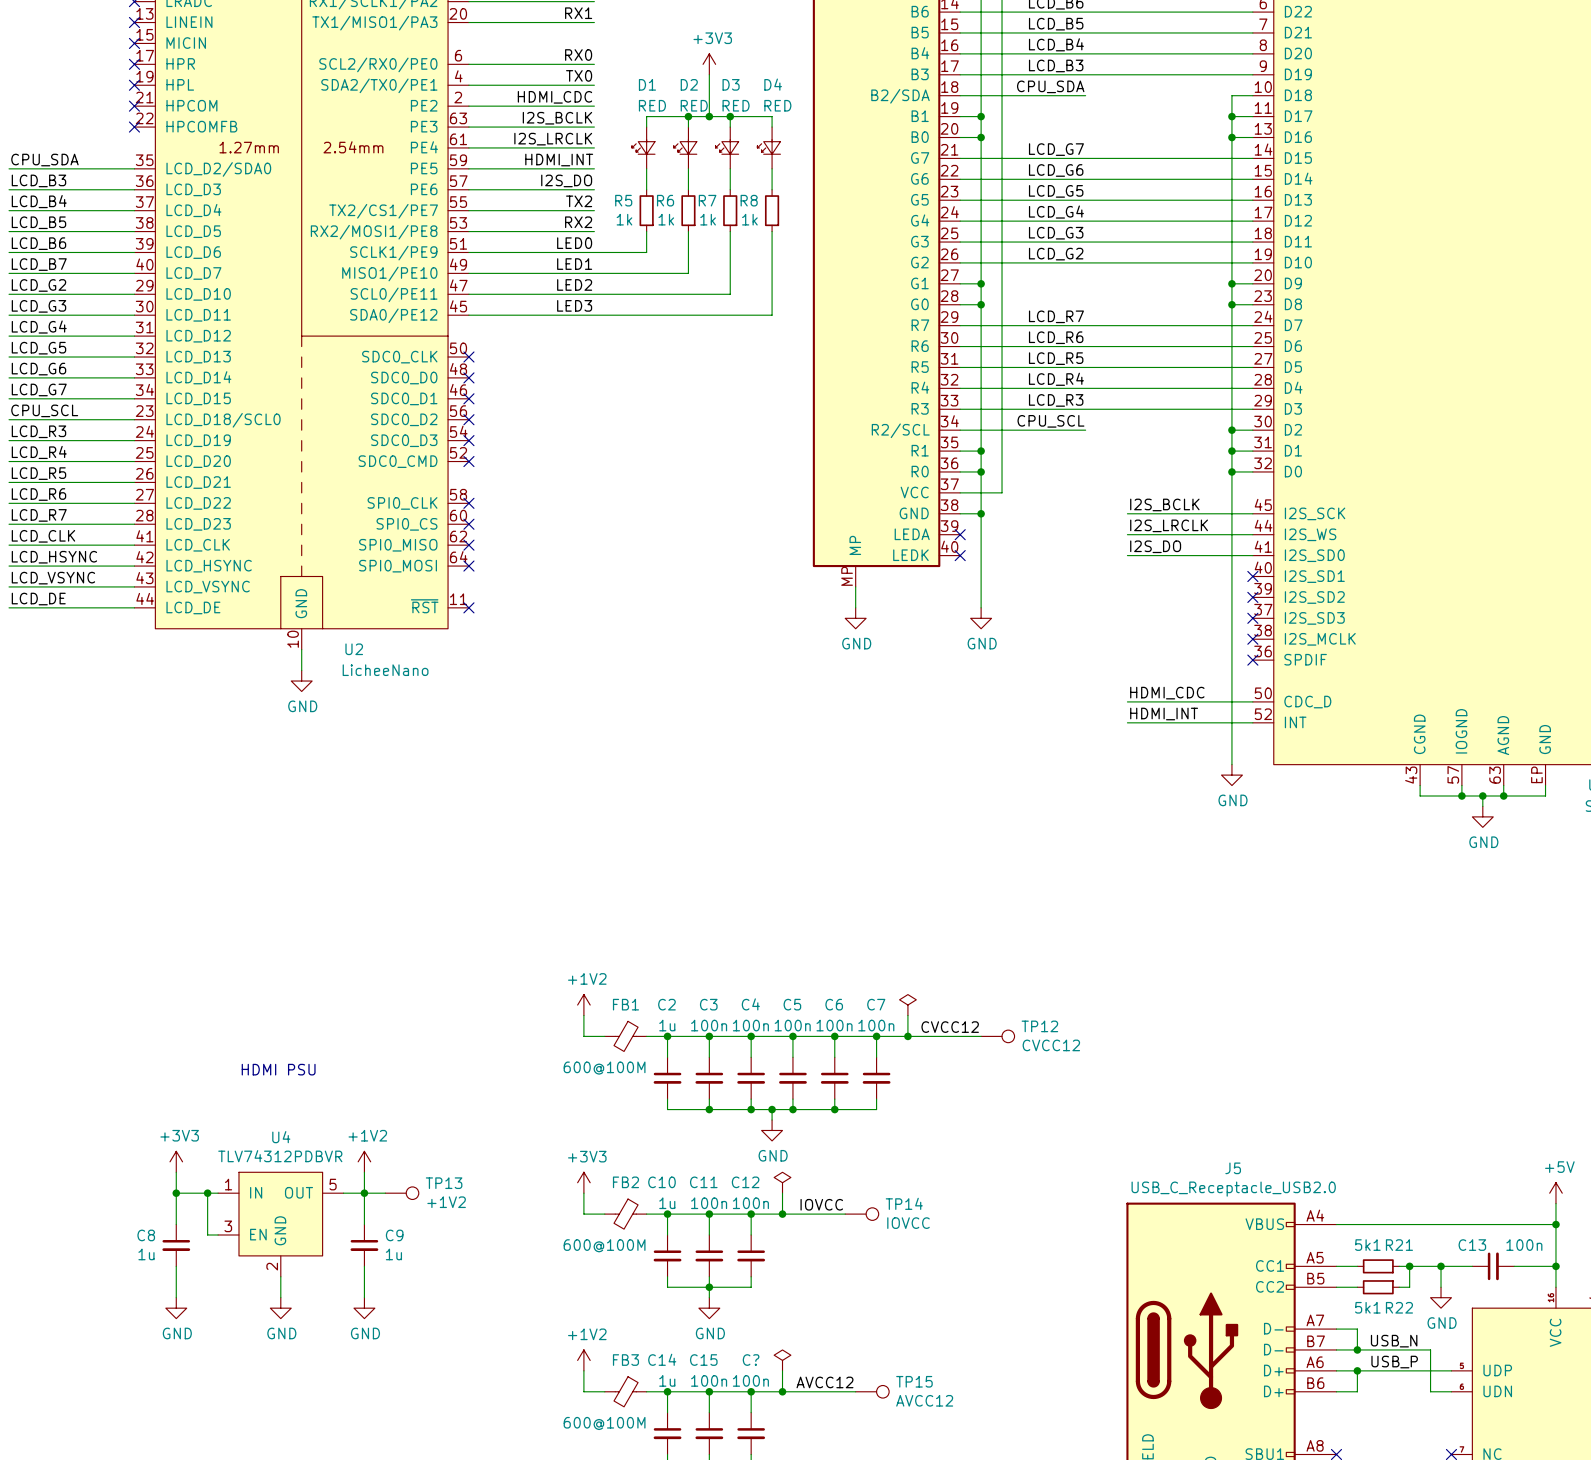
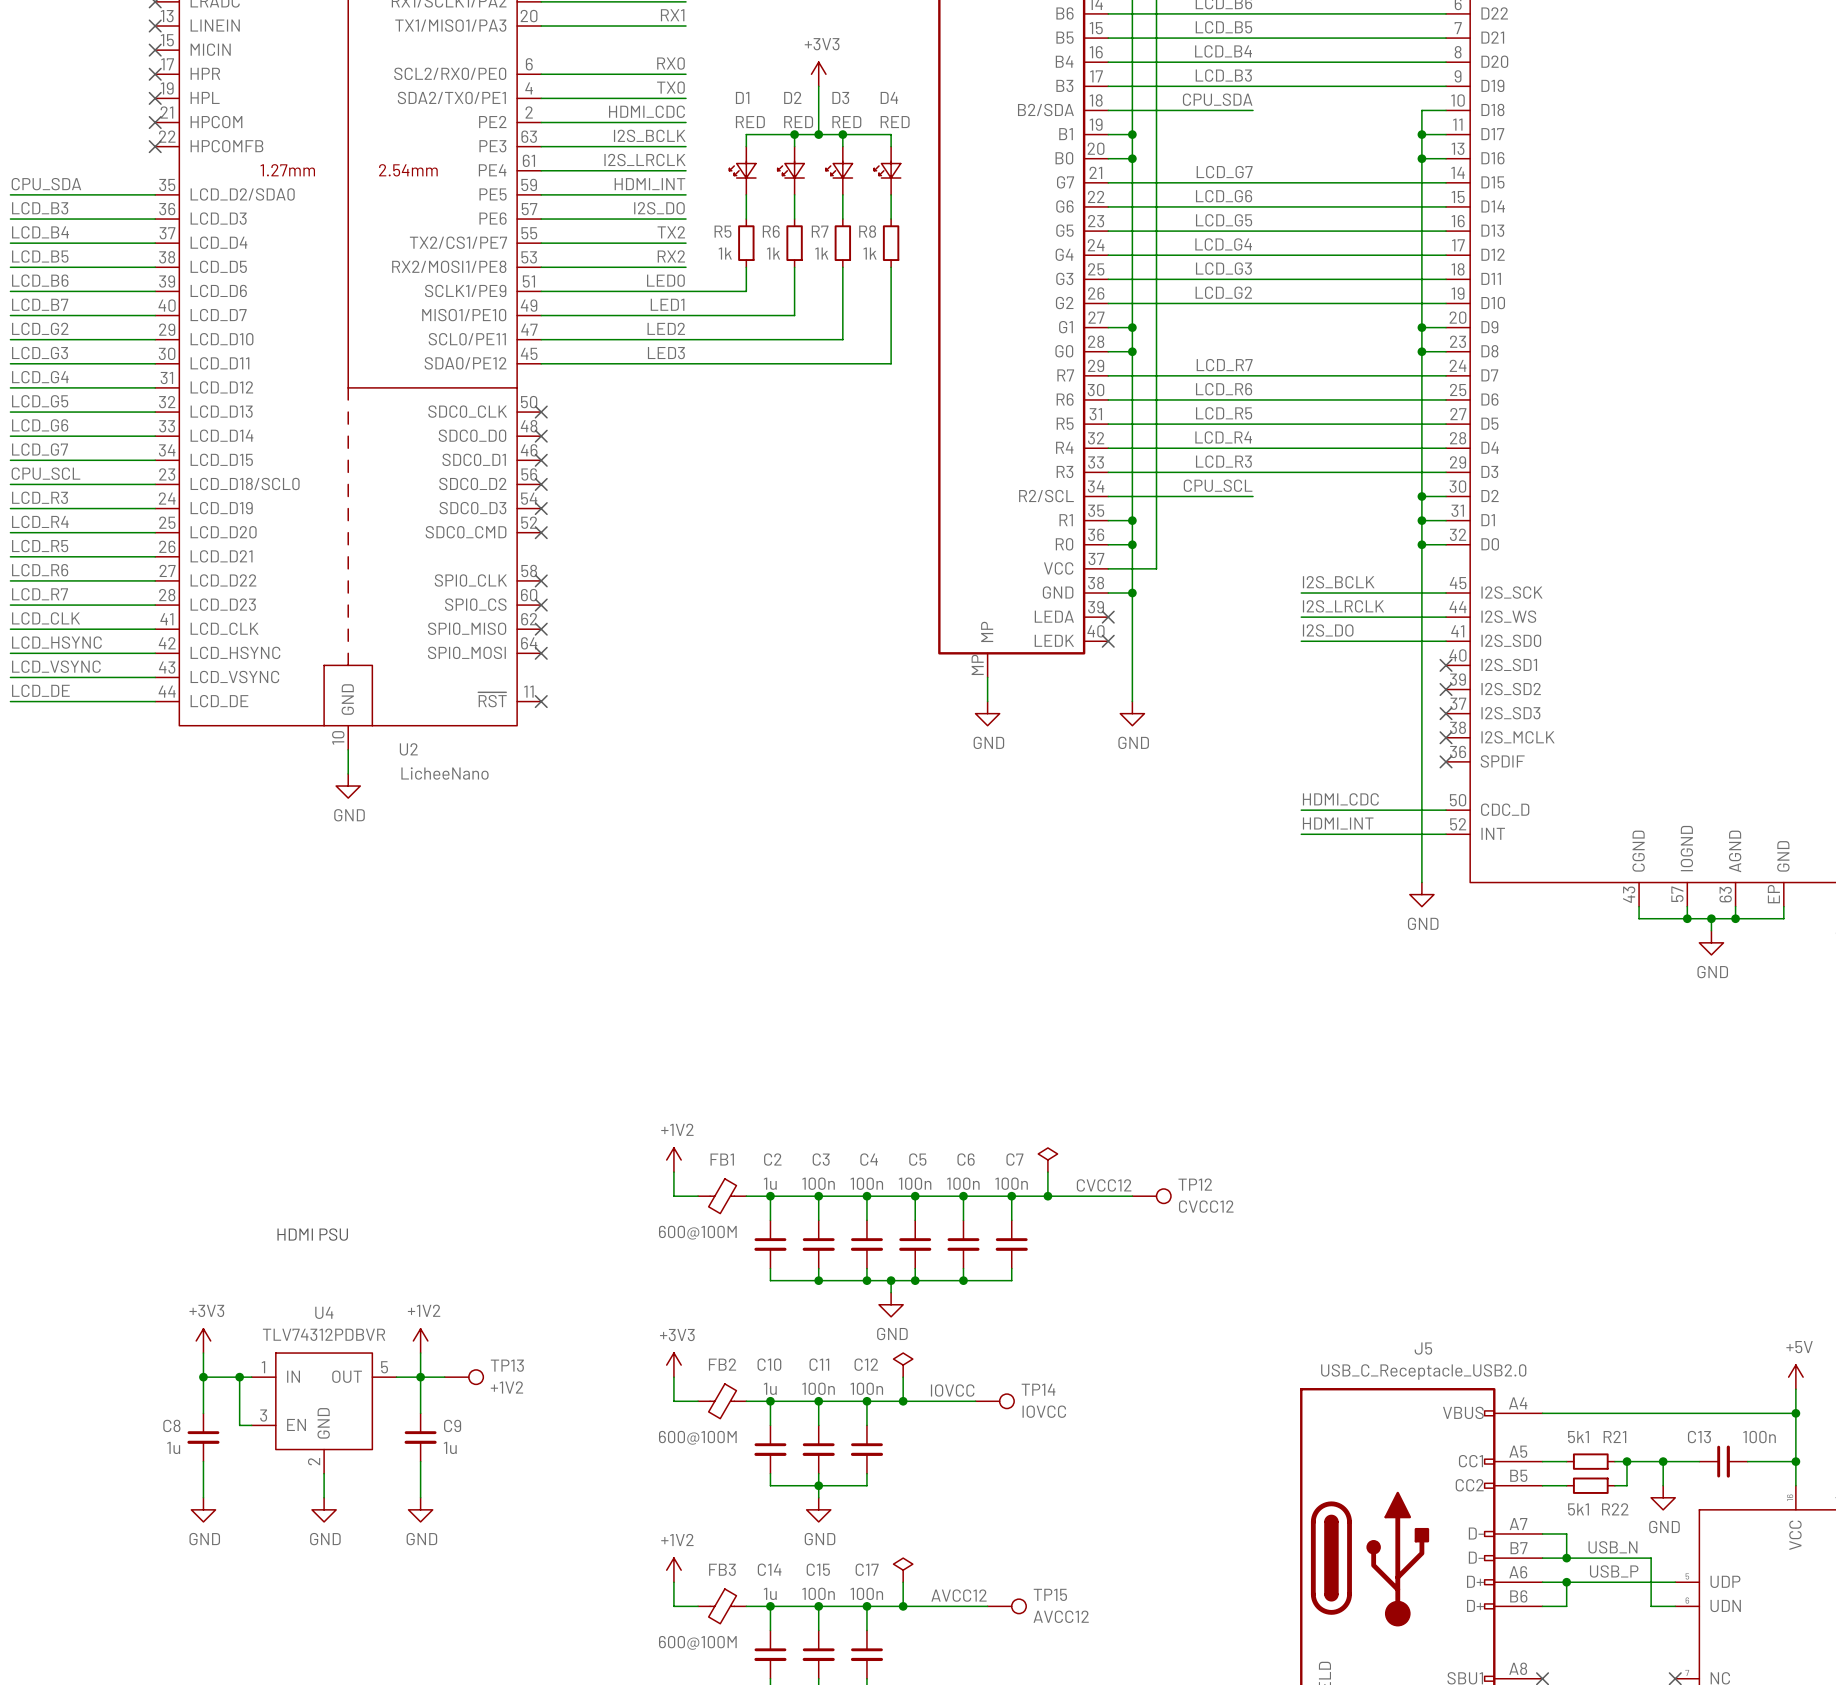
C? name: C? (751, 1360) -> C17 (867, 1569)

